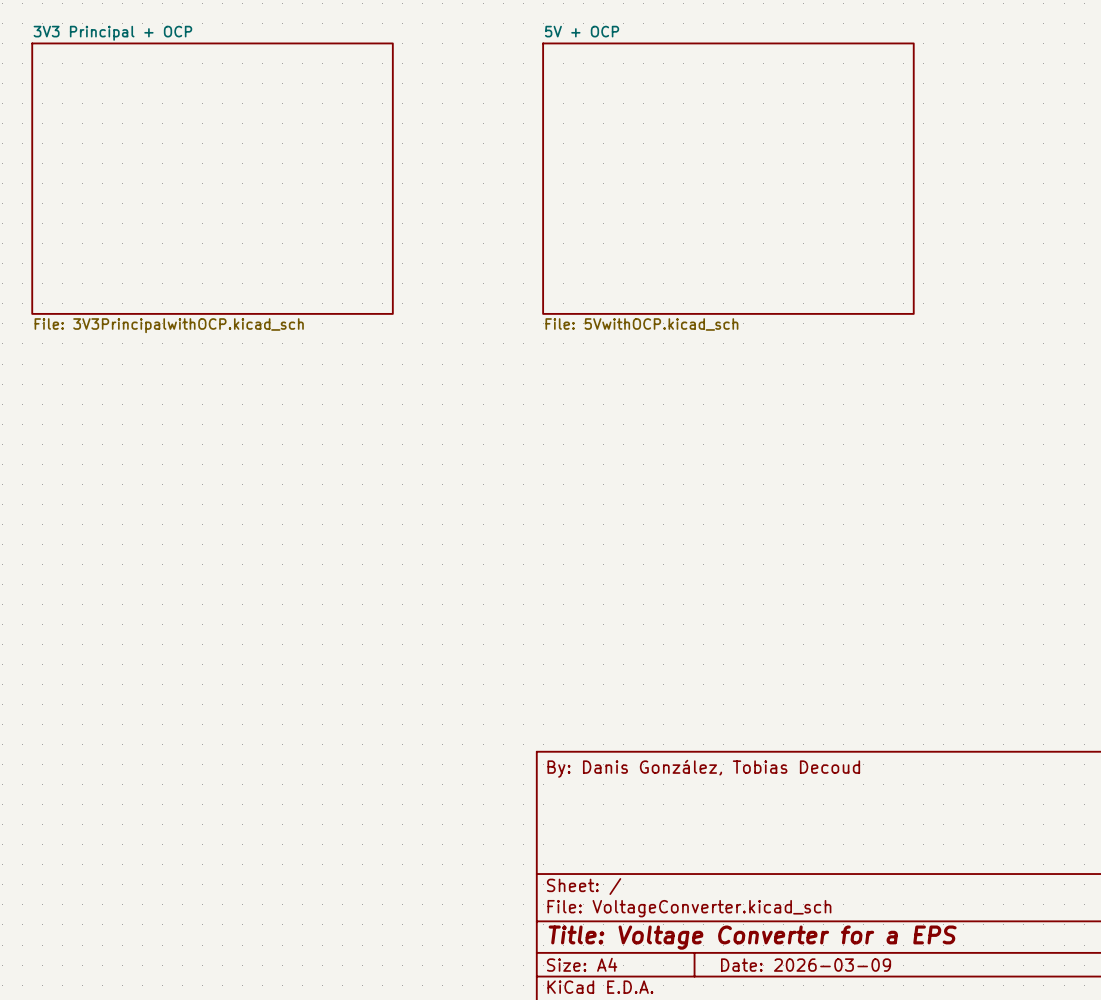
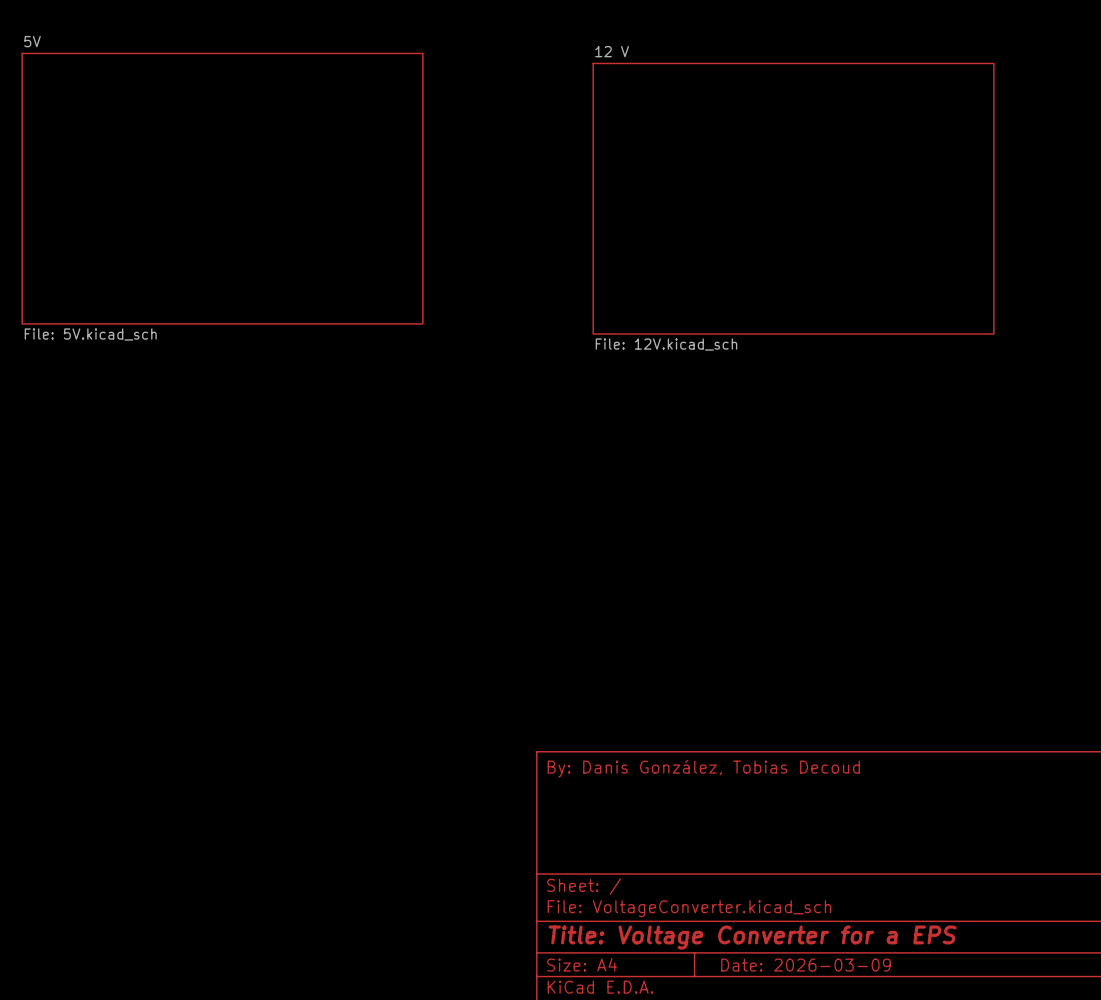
sheet 3V3 Principal + OCP: File: 3V3PrincipalwithOCP.kicad_sch (212, 178) -> none
sheet 5V + OCP: File: 5VwithOCP.kicad_sch (728, 178) -> none
sheet 5V: none -> File: 5V.kicad_sch (222, 188)
sheet 12 V: none -> File: 12V.kicad_sch (793, 198)

